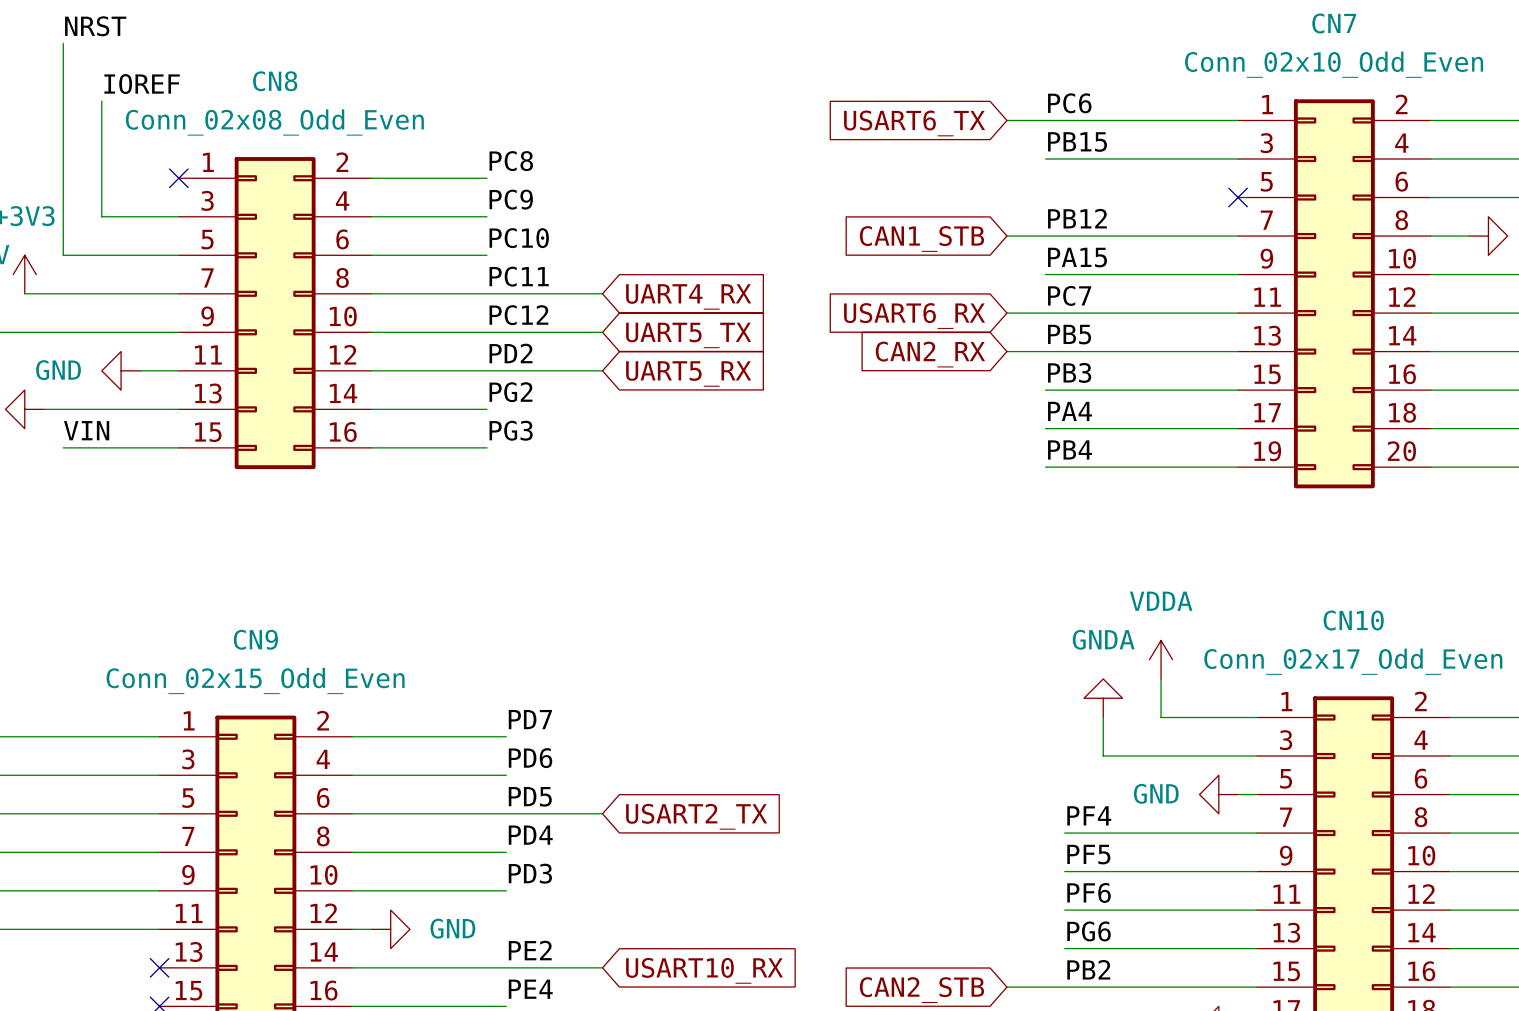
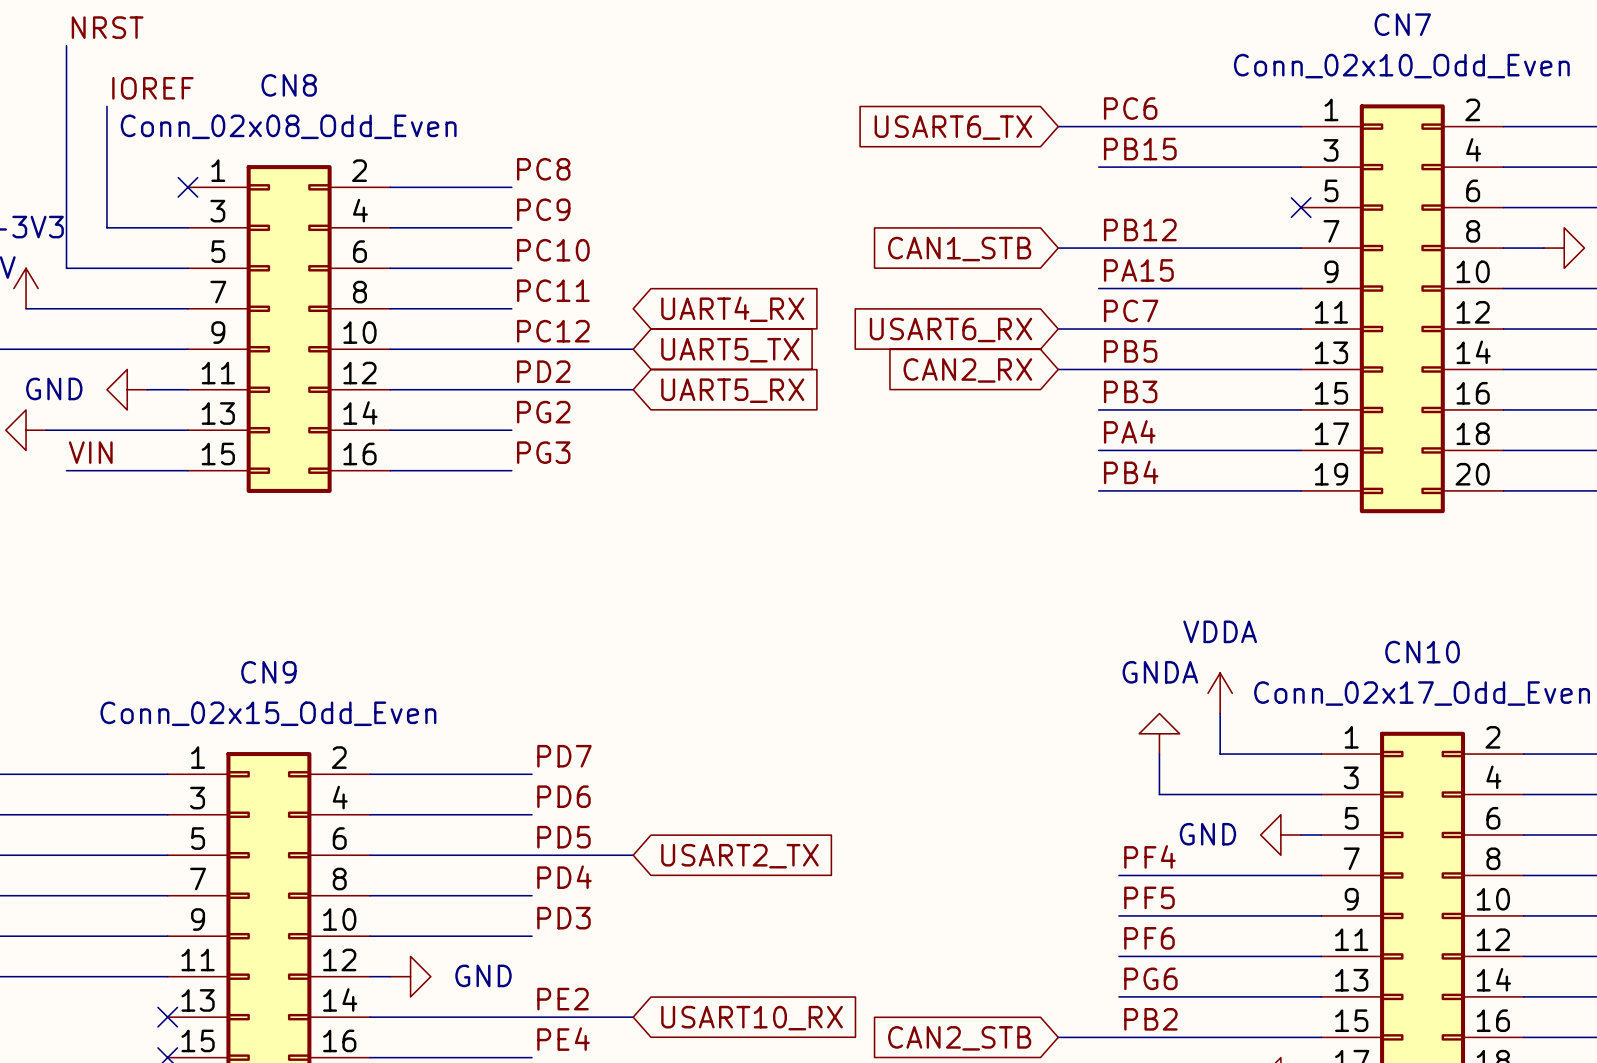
wire: (486, 293) (602, 293) -> none

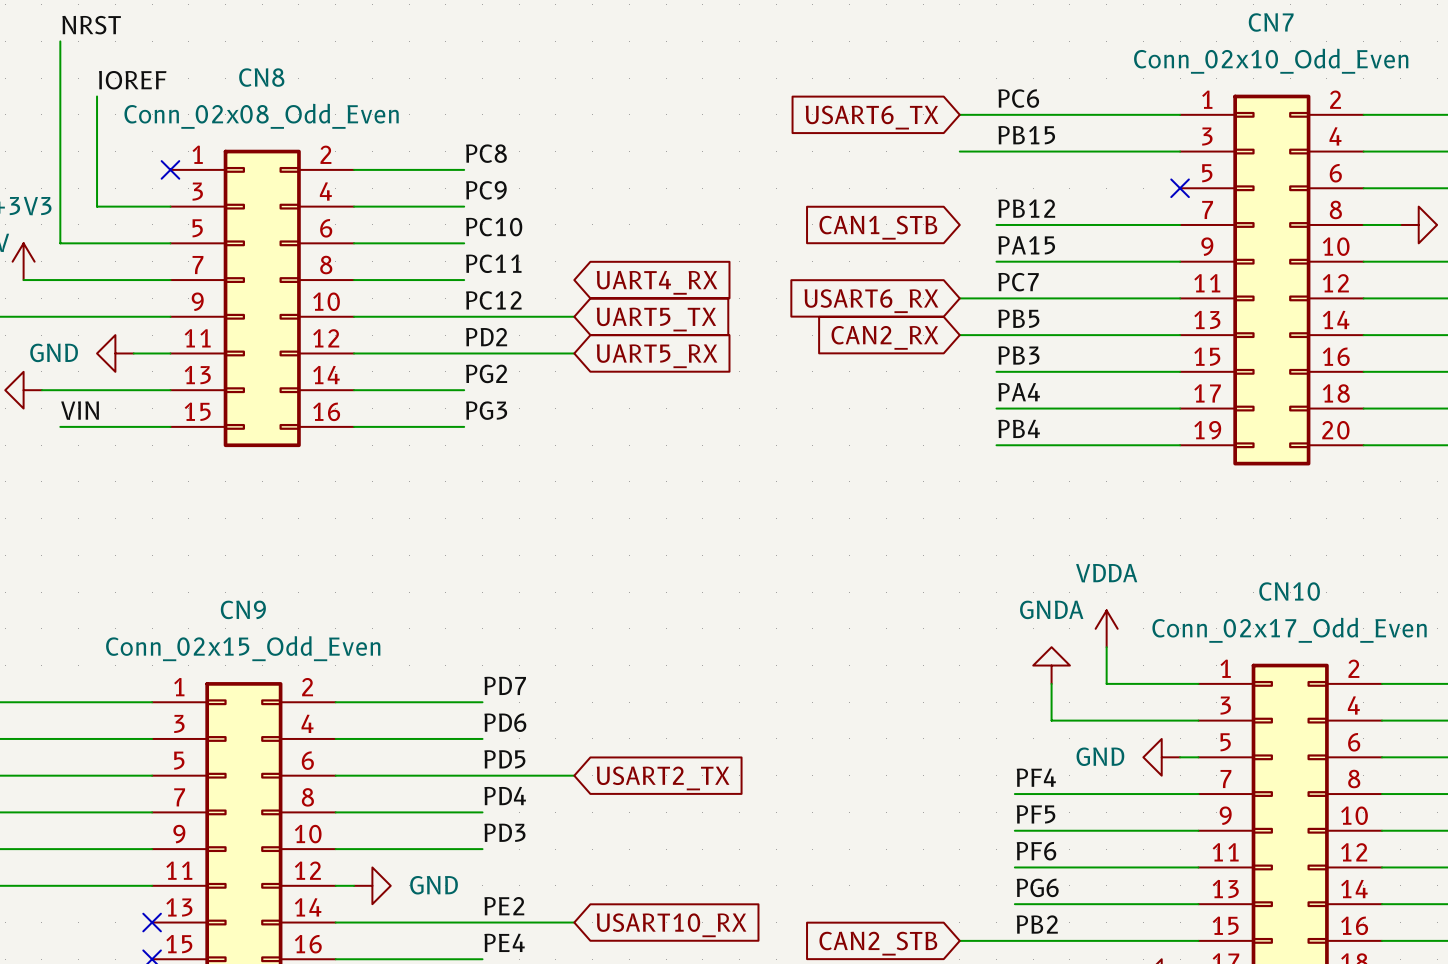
wire: (1058, 248) (1098, 248) -> (959, 151) (996, 151)

